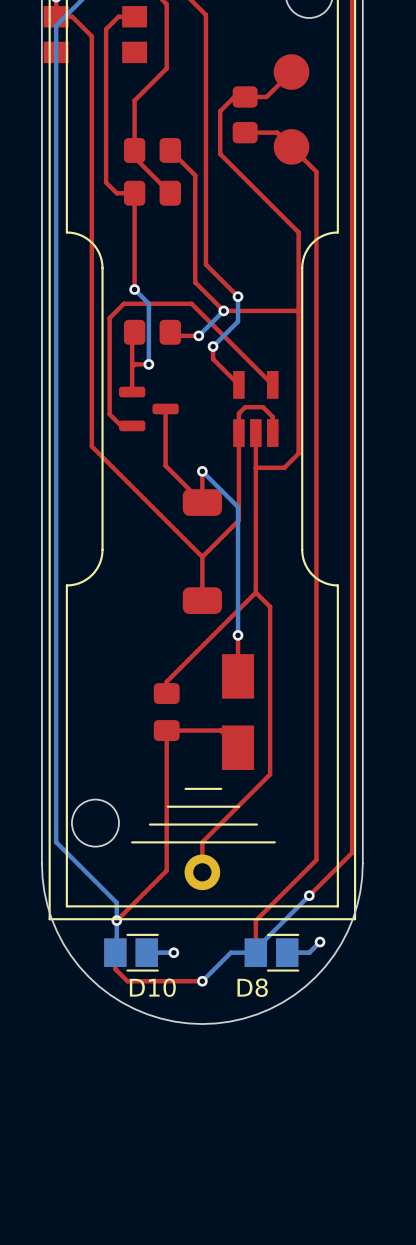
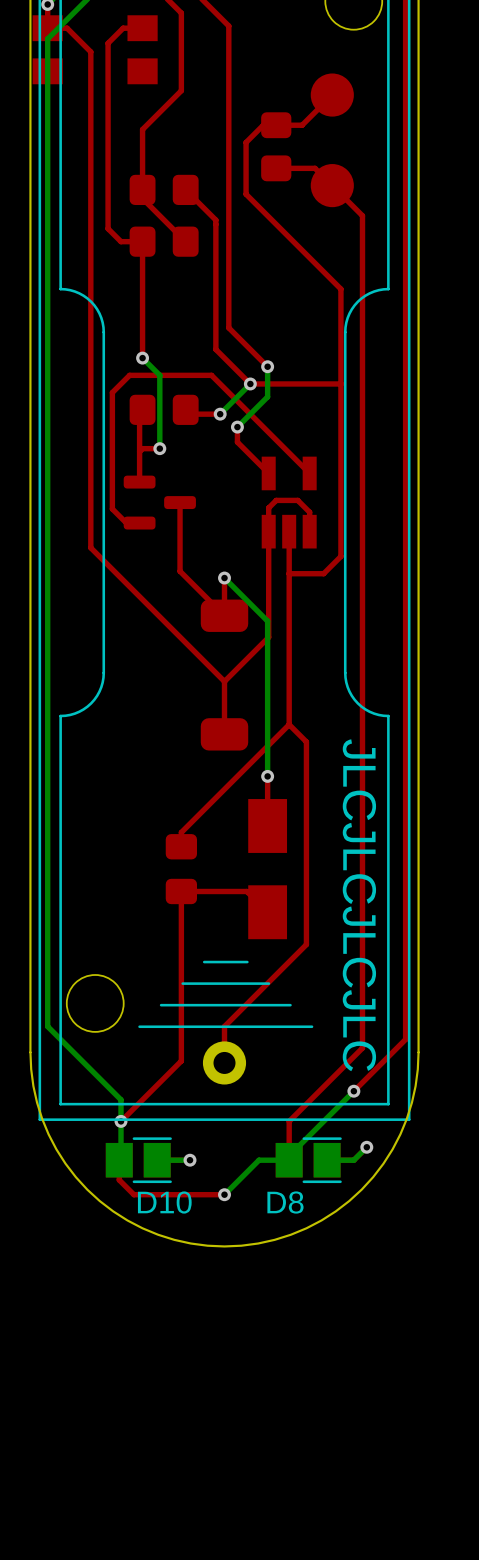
text: none -> JLCJLCJLCJLC (359, 905)

